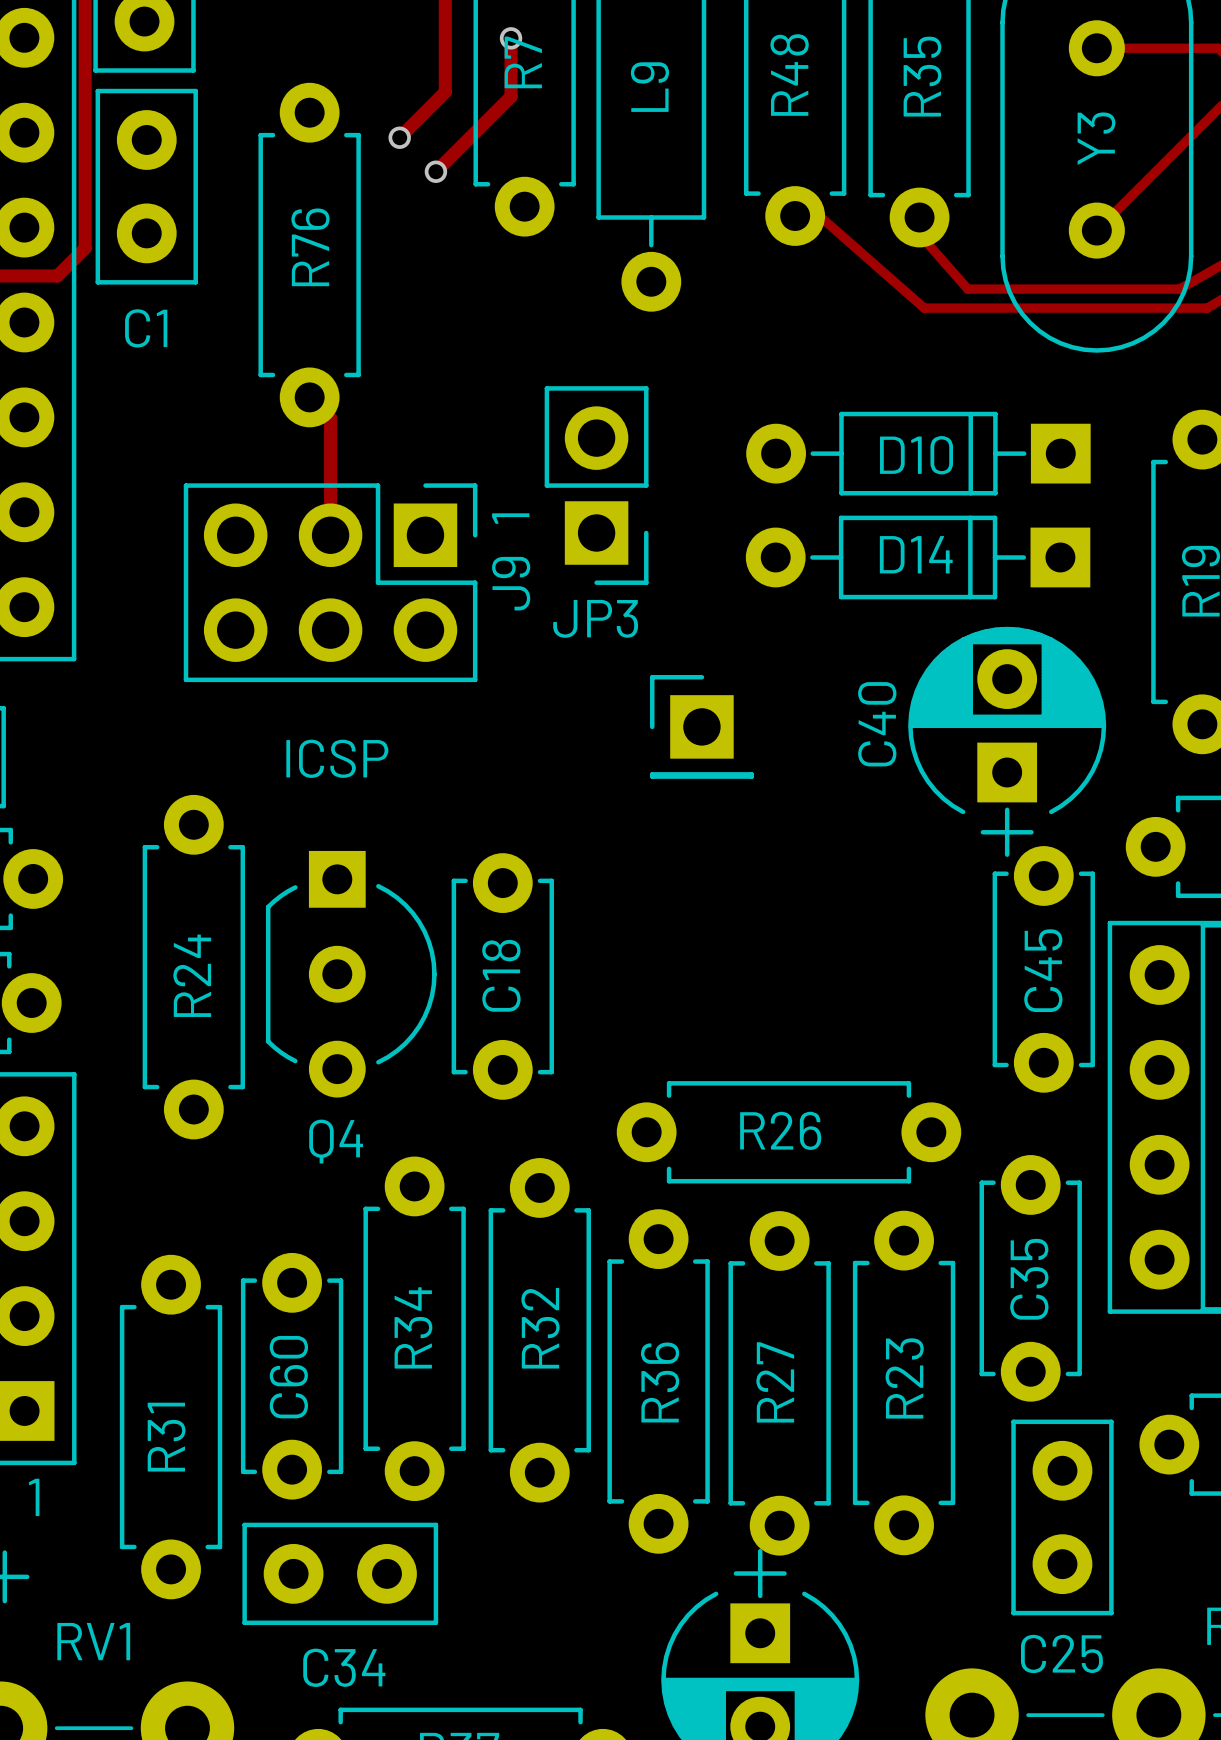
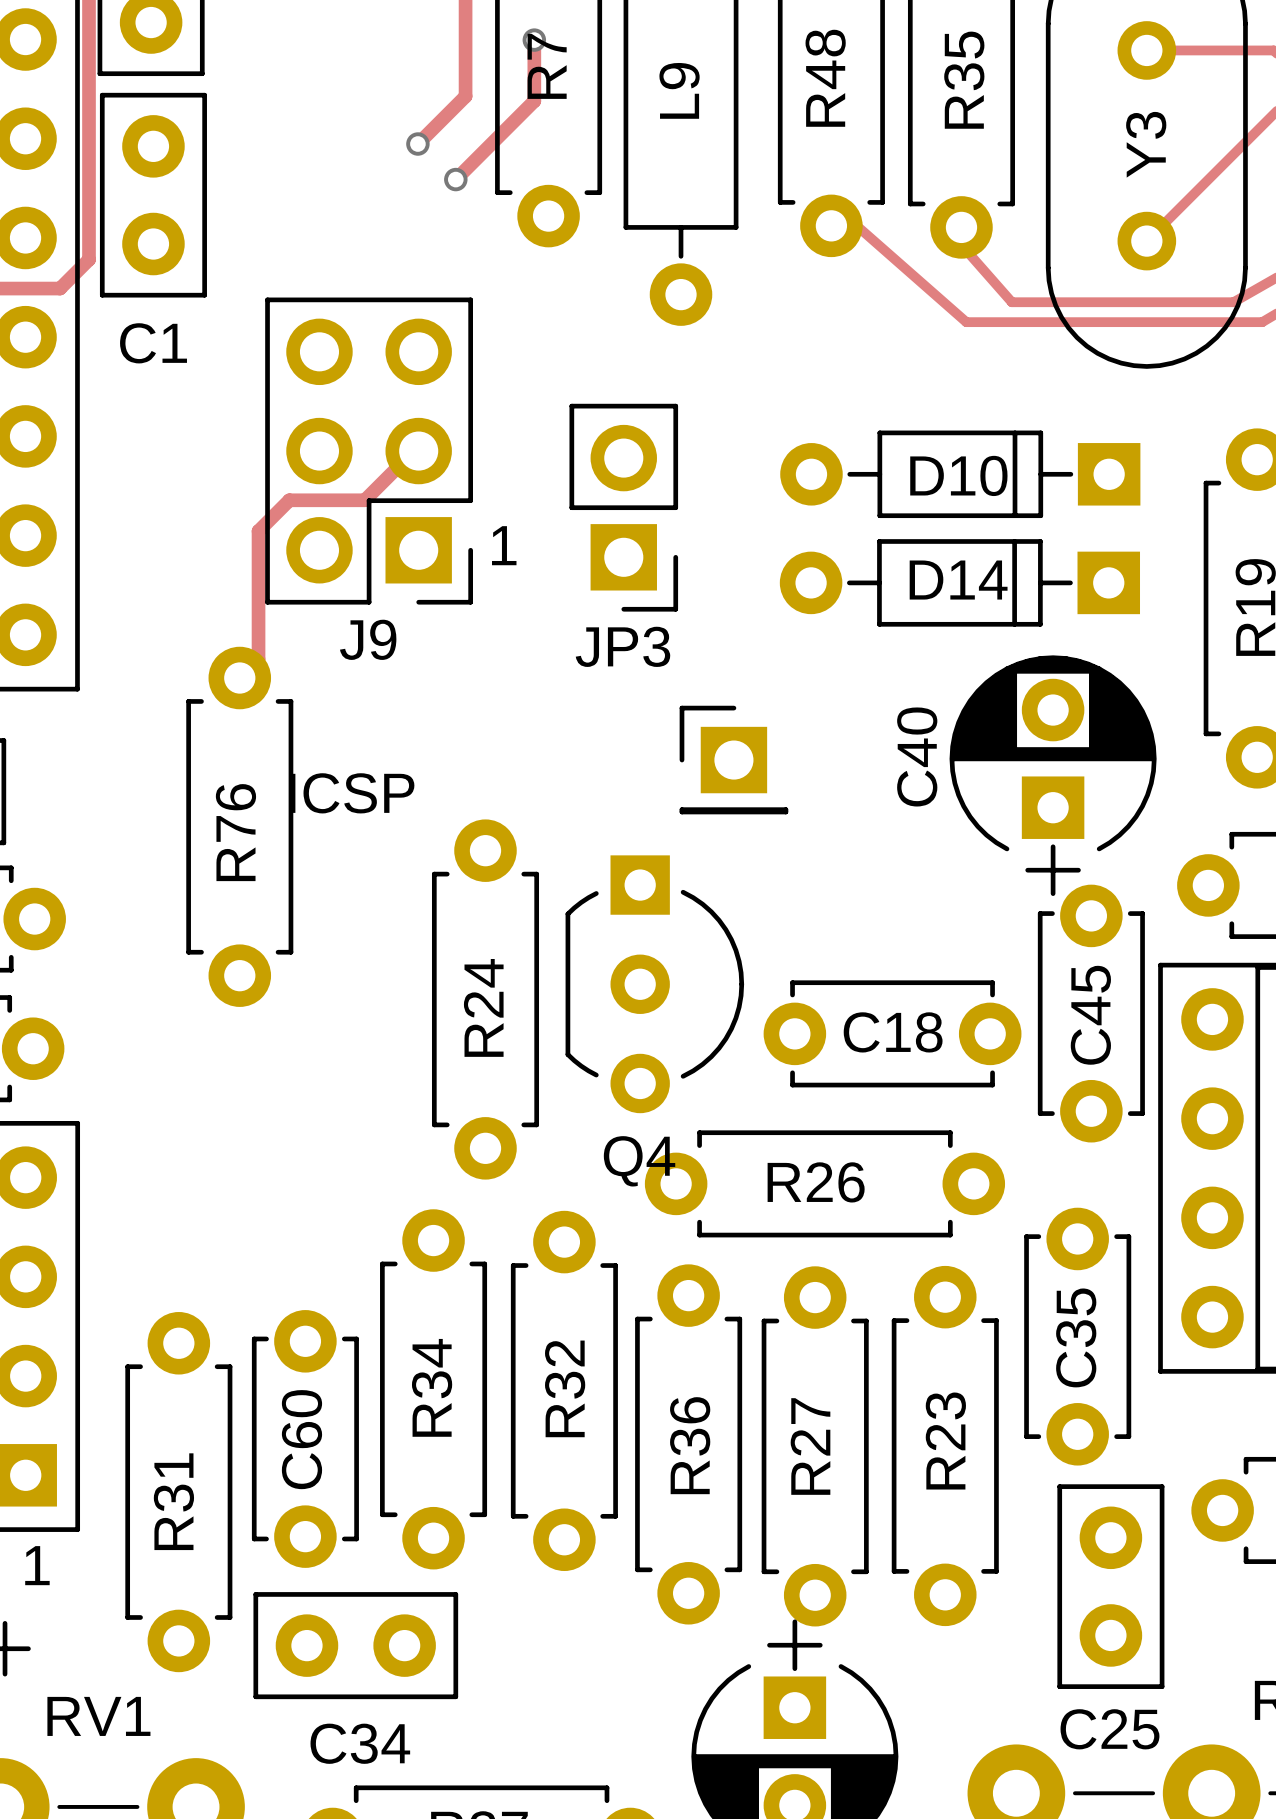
R76 name position: R76 (310, 247) -> R76 (235, 832)
R76 position: (309, 255) -> (239, 826)
track: (309, 397) (330, 418) (330, 535) -> none
track: none -> (418, 451) (414, 451) (364, 500) (289, 500) (258, 531) (258, 659) (239, 678)
text rotation: 0° (510, 518) -> 90° clockwise (504, 545)
J9 rotation: 0° (330, 582) -> 90° clockwise (369, 451)
R24 position: (193, 967) -> (485, 999)
Q4 position: (351, 974) -> (654, 984)
C18 rotation: 0° (502, 976) -> 90° clockwise (892, 1033)
C18 position: (502, 976) -> (892, 1033)

